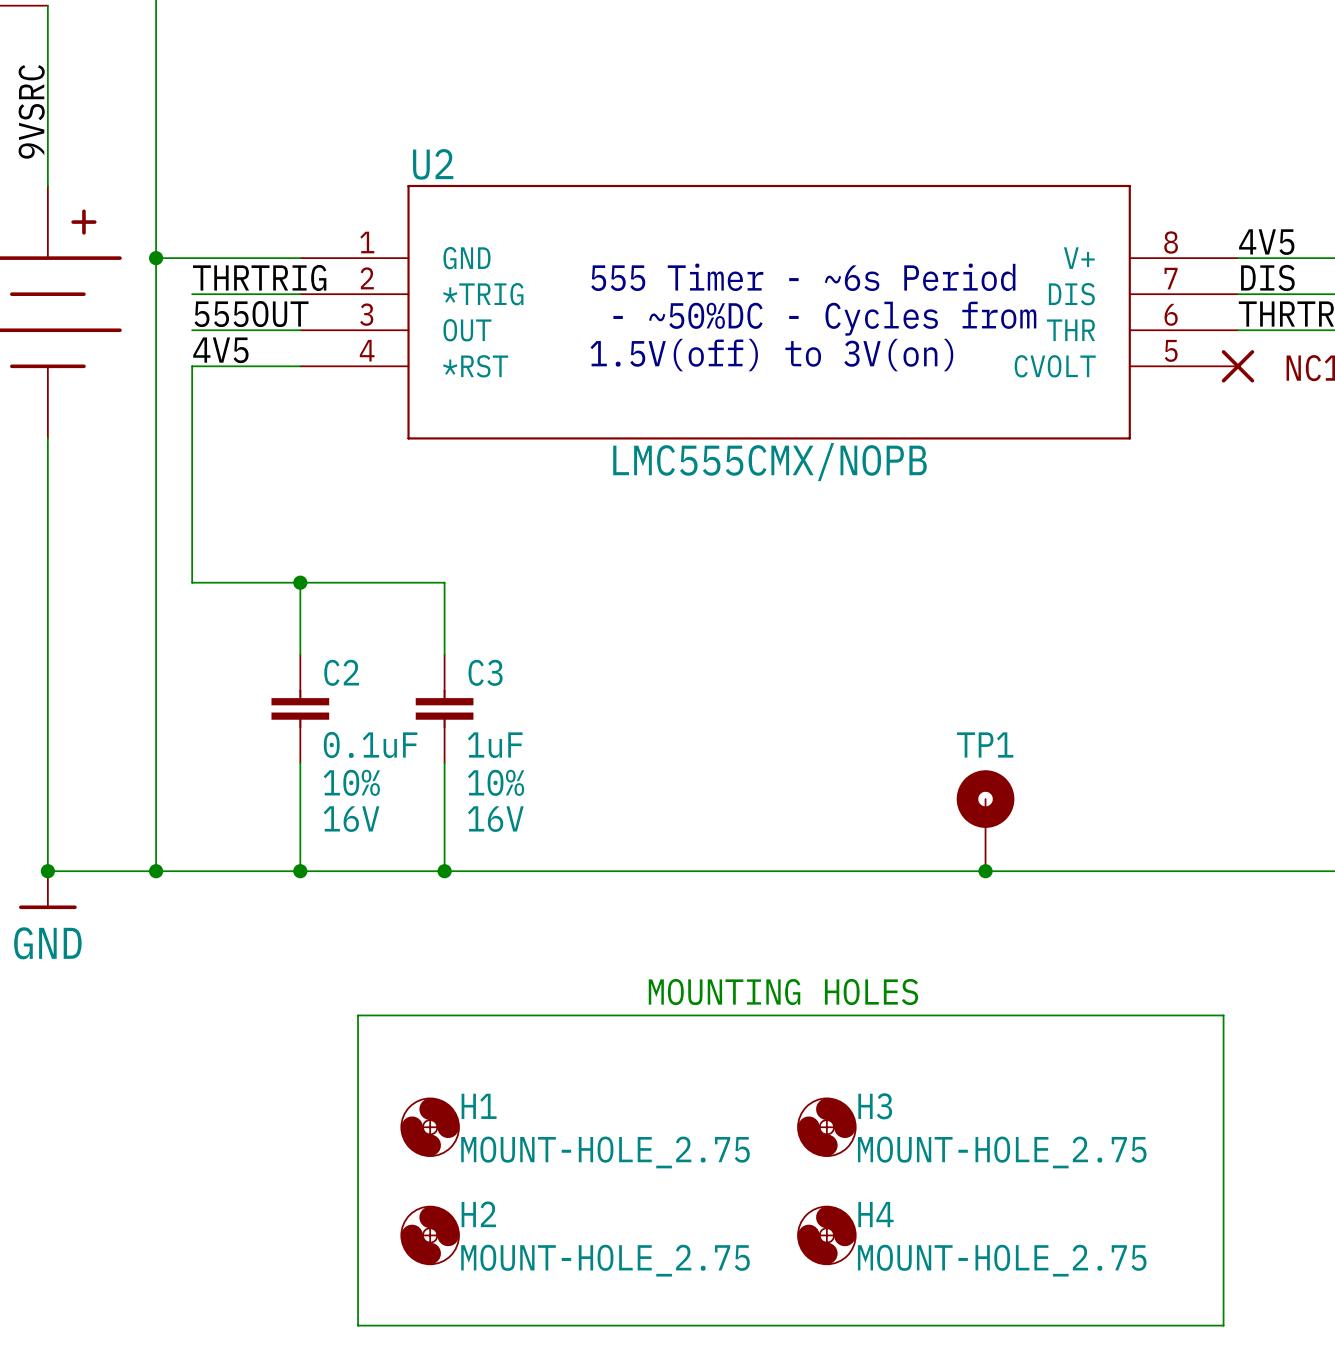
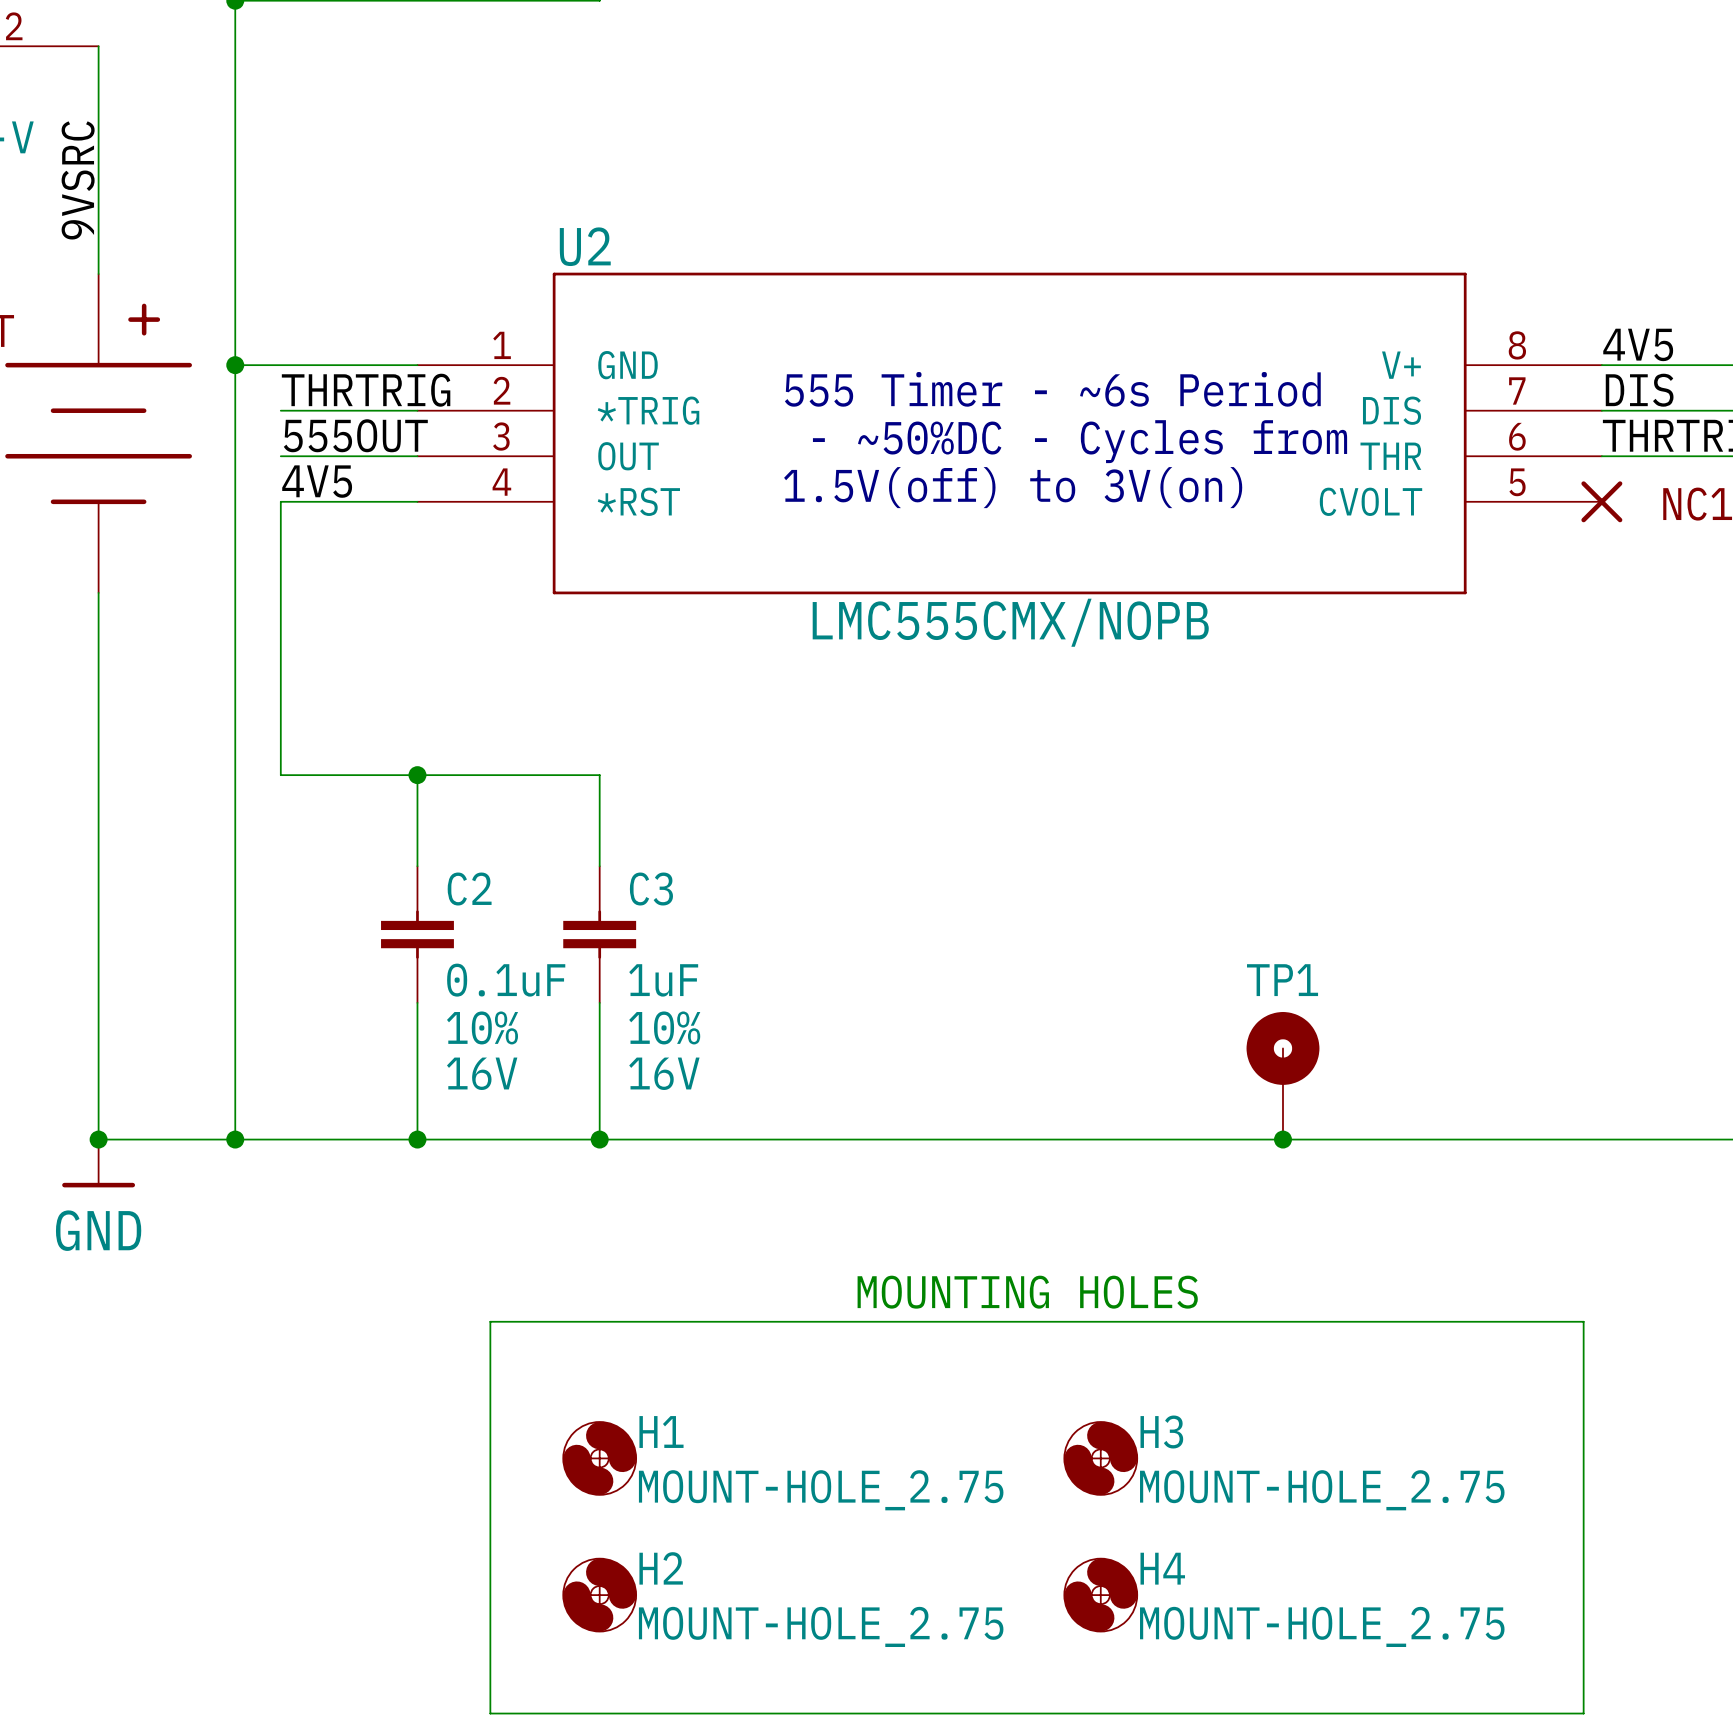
H1 position: (430, 1127) -> (599, 1458)
H3 position: (826, 1127) -> (1100, 1458)
H2 position: (430, 1235) -> (599, 1595)
H4 position: (826, 1235) -> (1100, 1595)

